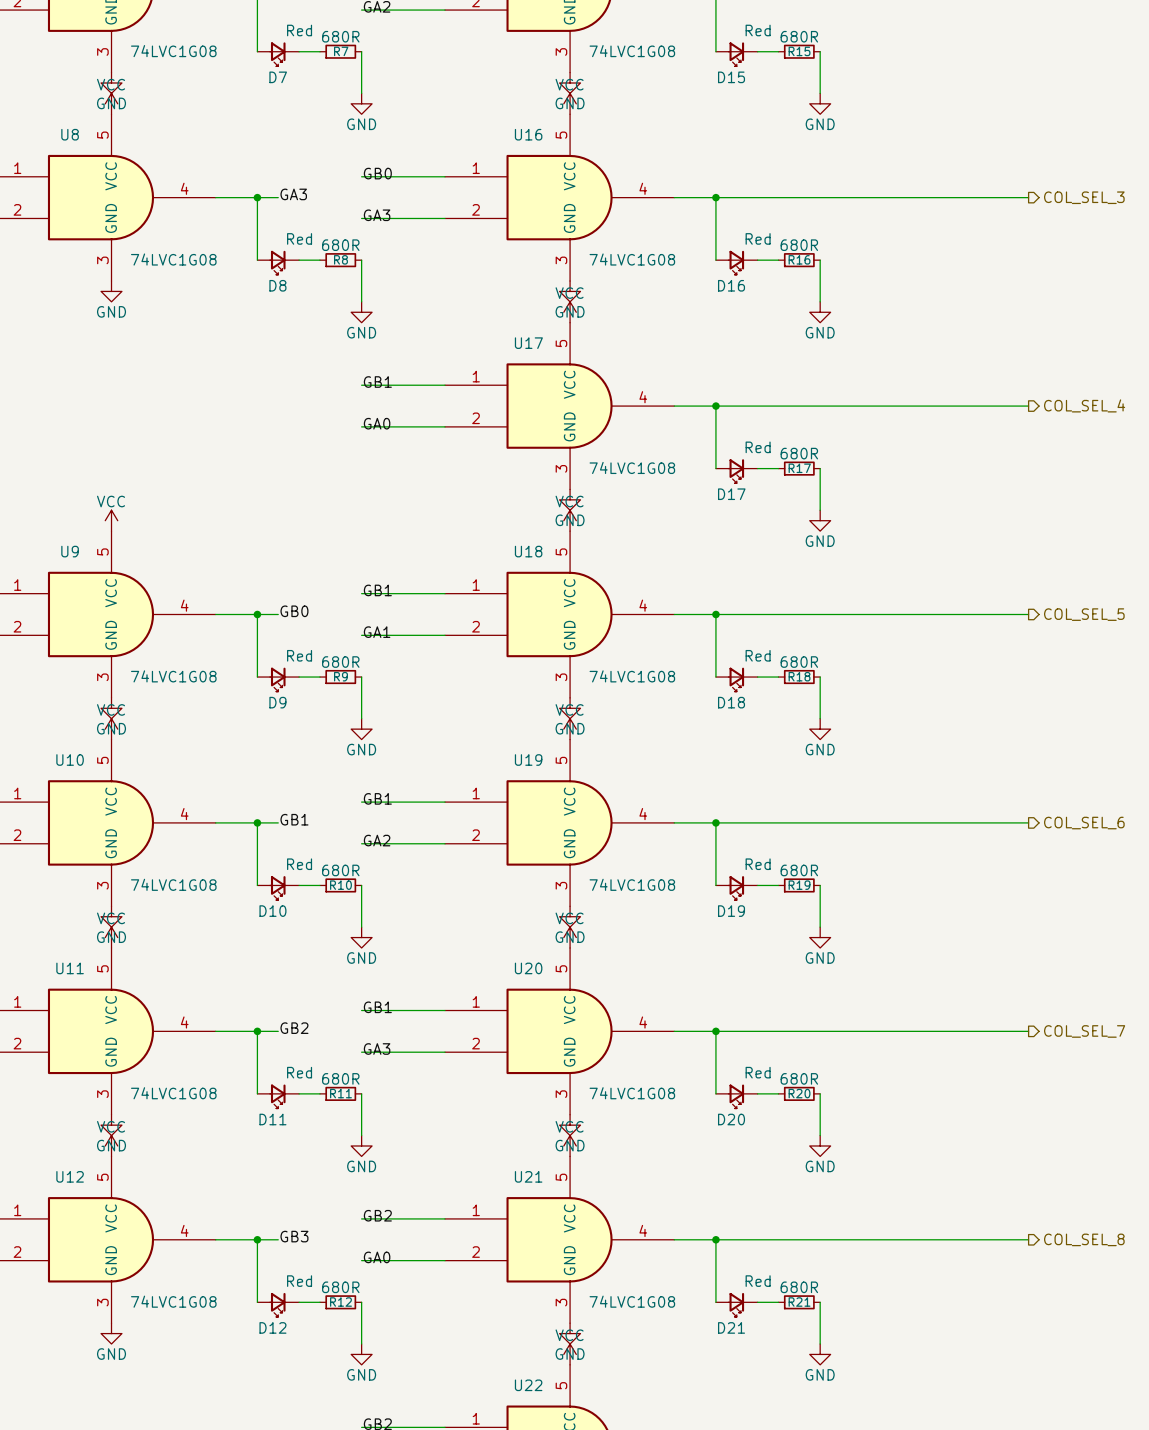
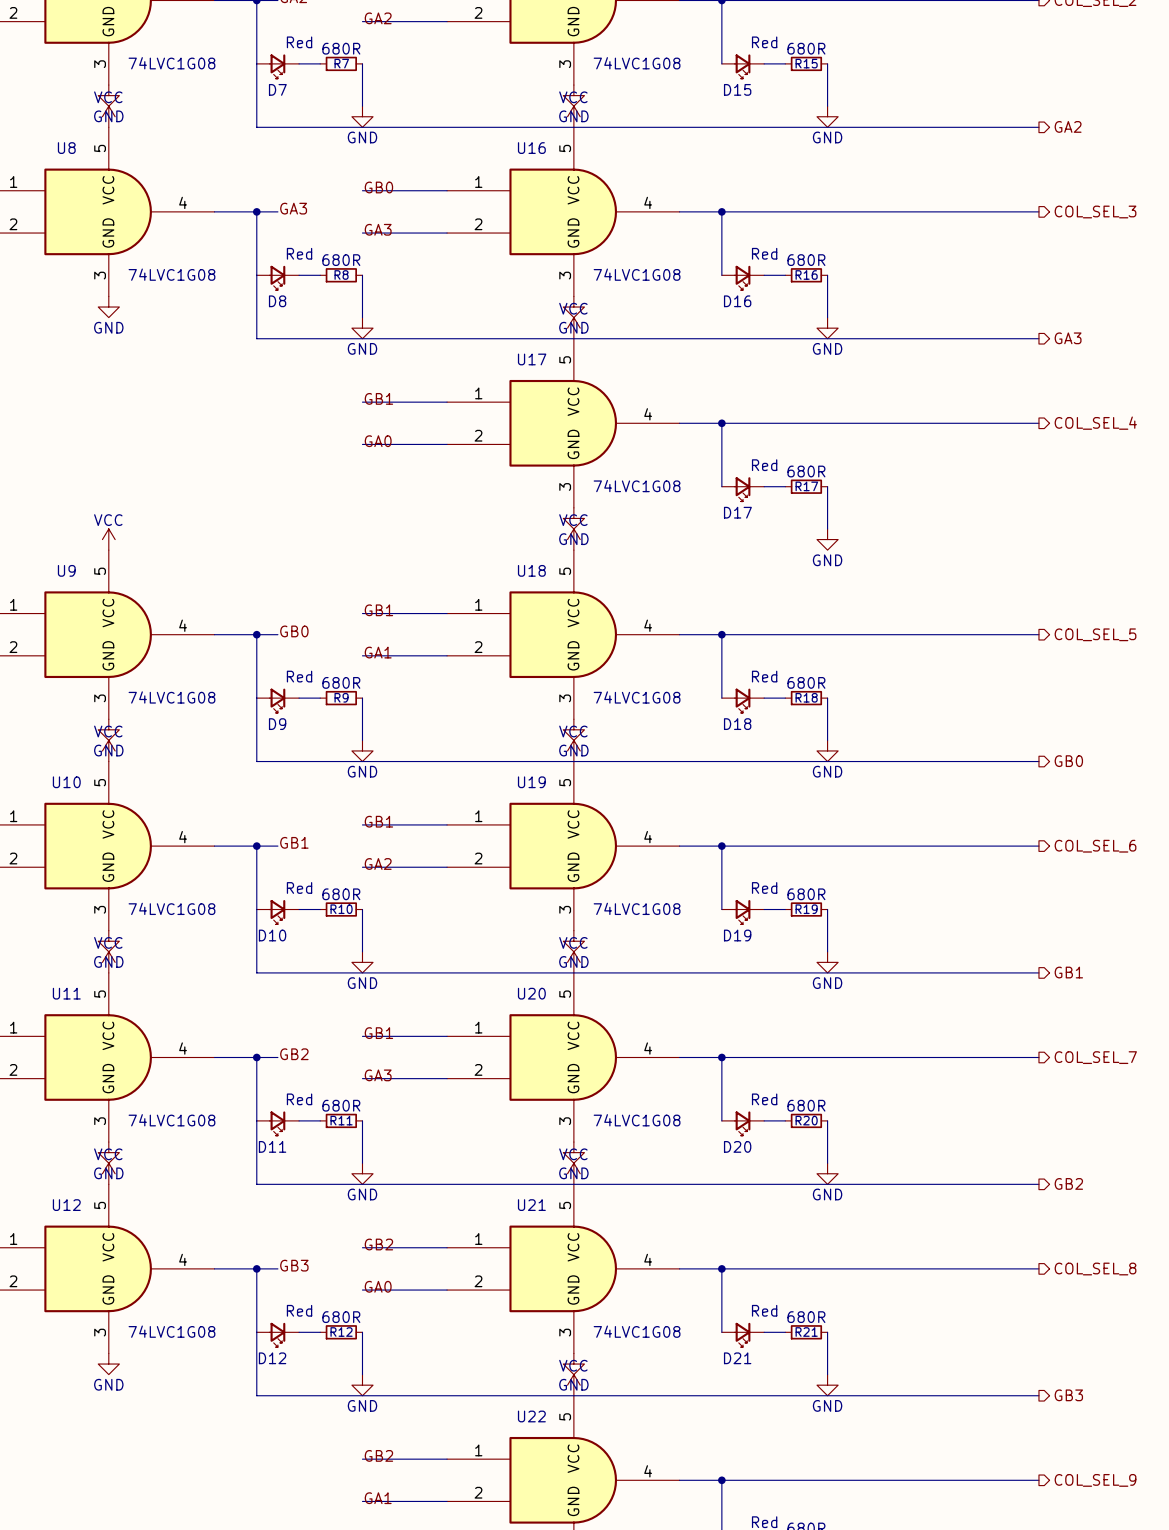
wire: none -> (256, 63) (256, 127) (1038, 127)
hierarchical label: none -> GA2 (1068, 126)
wire: none -> (256, 275) (256, 338) (1038, 338)
hierarchical label: none -> GA3 (1068, 338)
wire: none -> (256, 698) (256, 761) (1038, 761)
hierarchical label: none -> GB0 (1068, 761)
wire: none -> (256, 909) (256, 972) (1038, 972)
hierarchical label: none -> GB1 (1068, 972)
wire: none -> (256, 1120) (256, 1184) (1038, 1184)
hierarchical label: none -> GB2 (1068, 1183)
wire: none -> (256, 1332) (256, 1395) (1038, 1395)
hierarchical label: none -> GB3 (1068, 1395)

